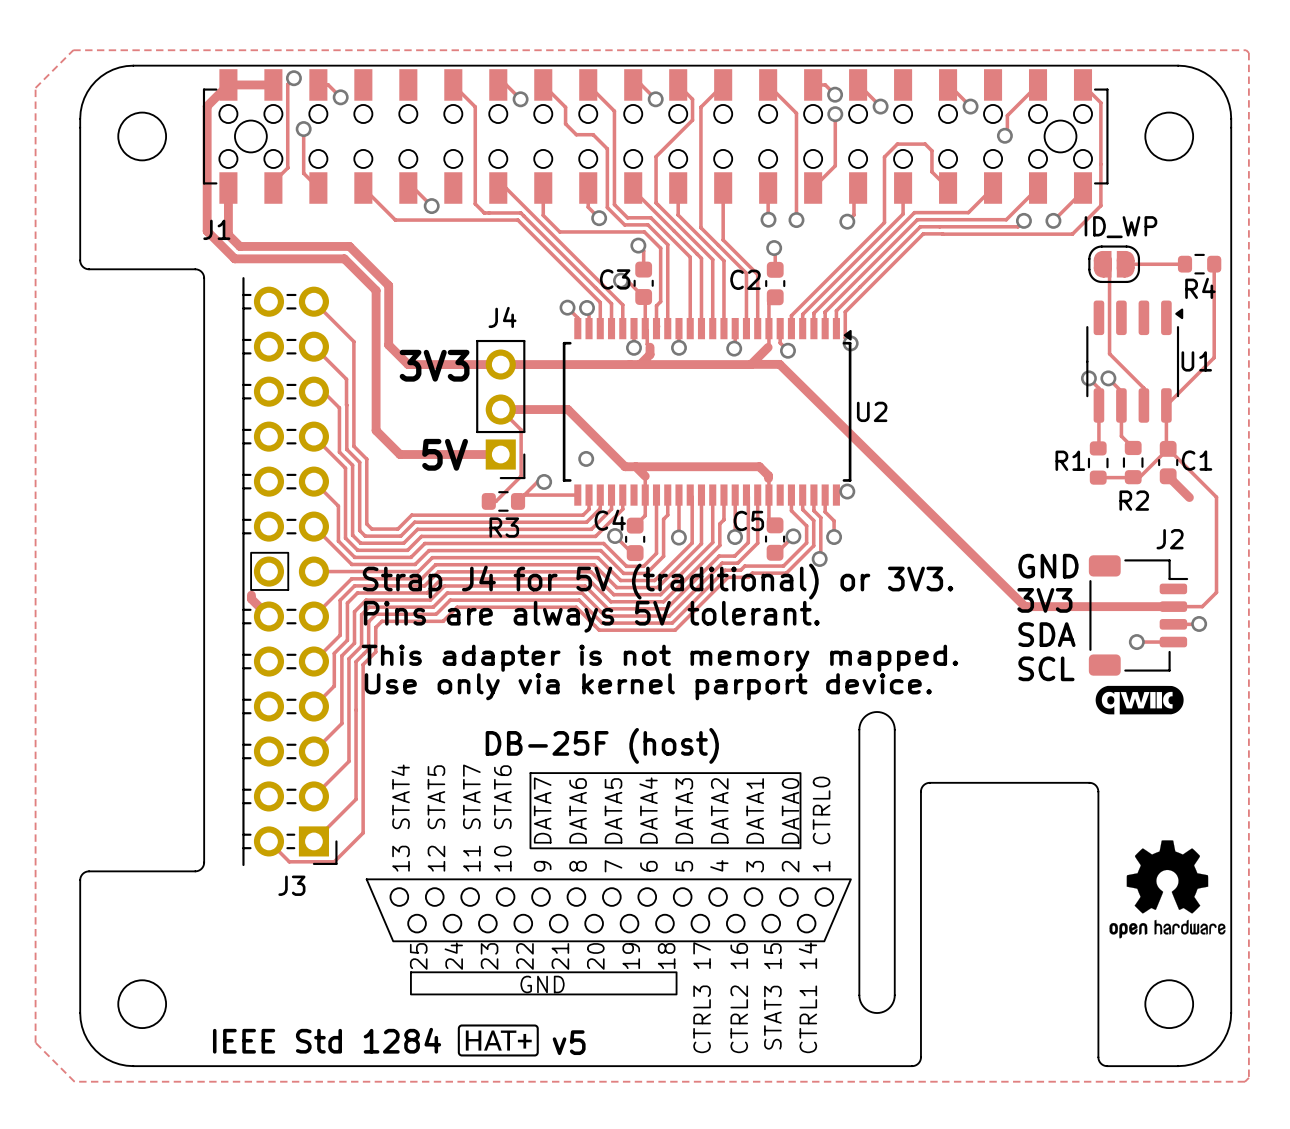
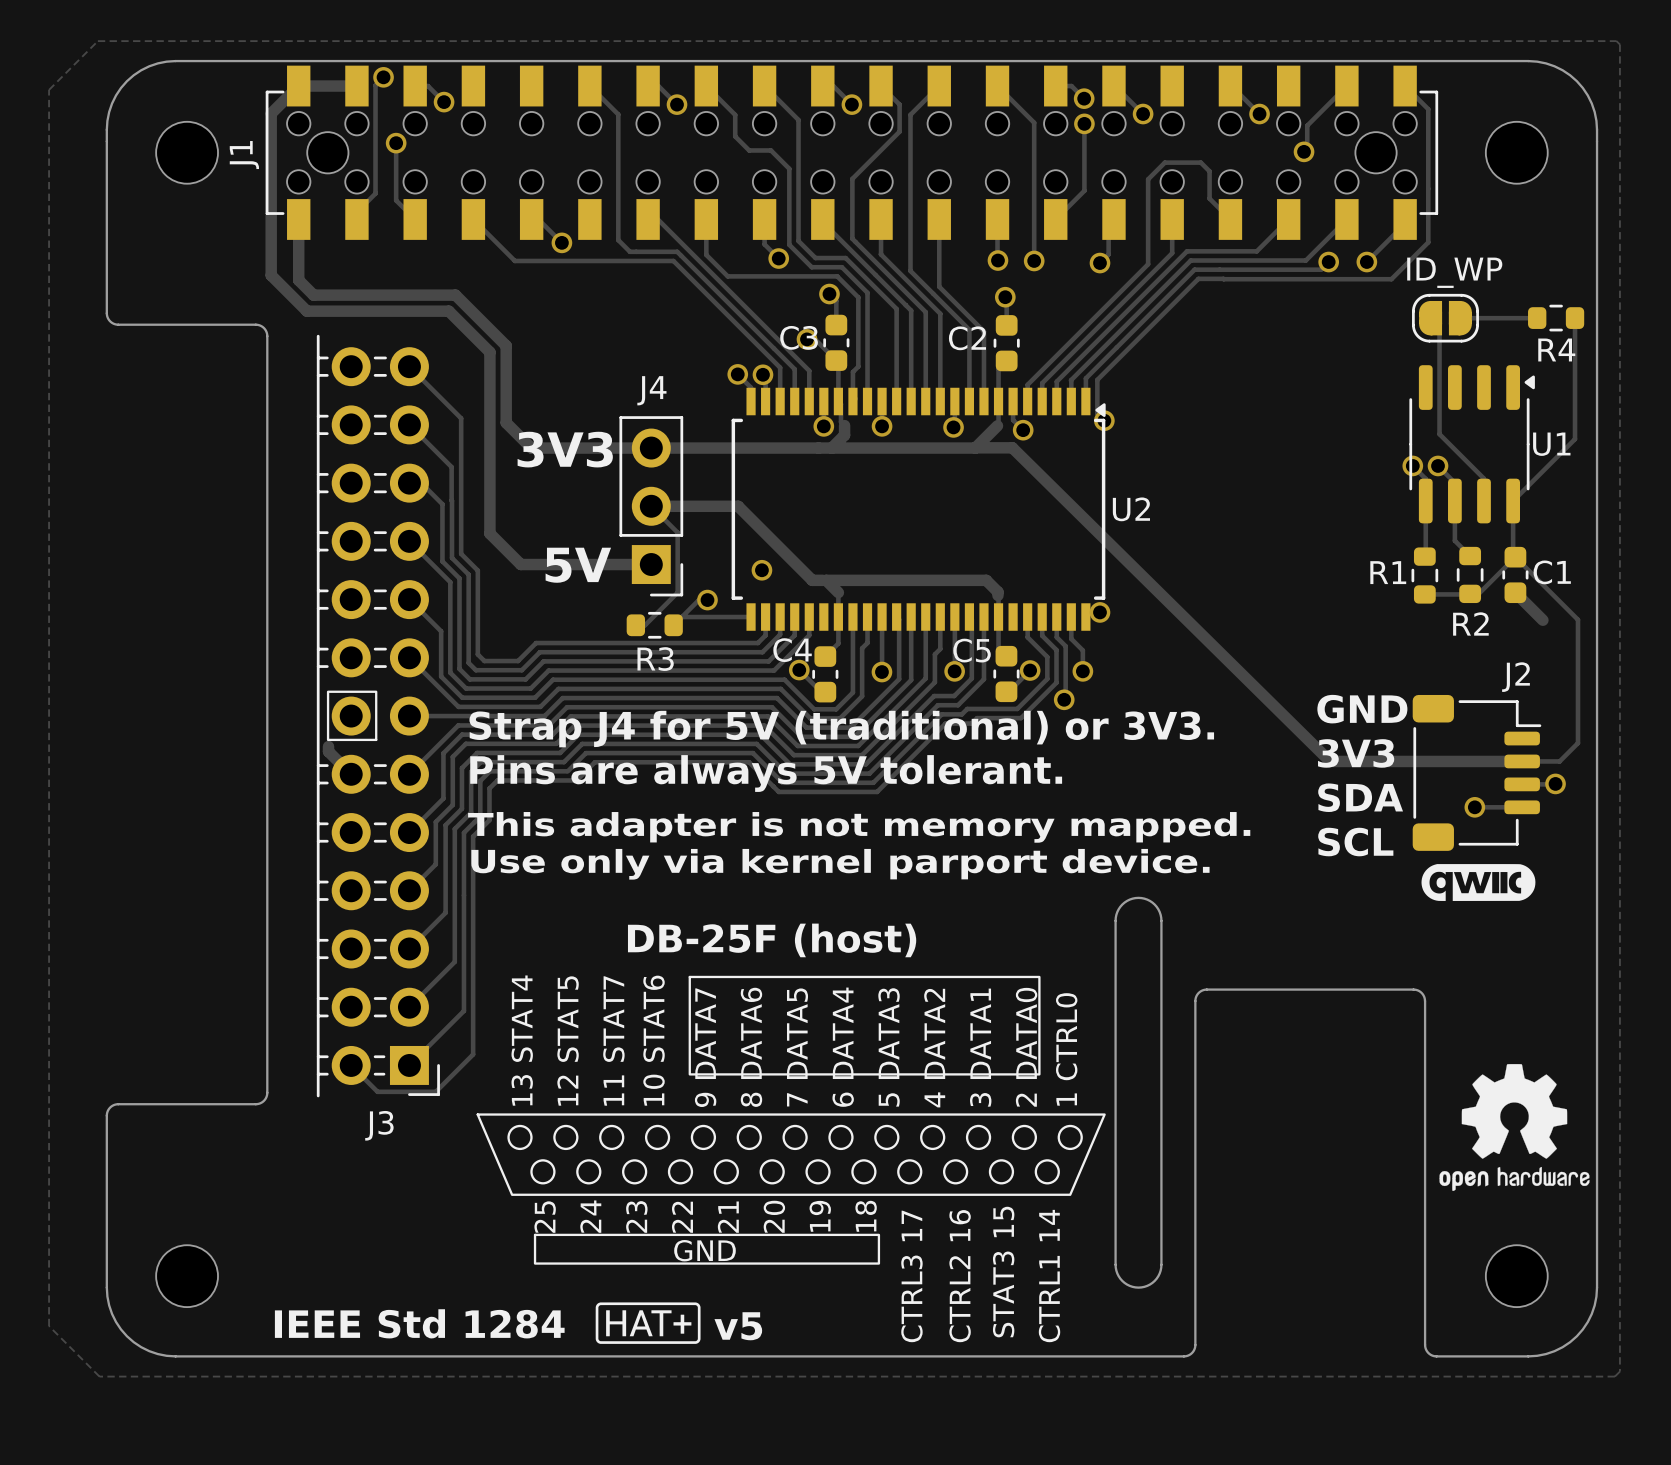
J1 name rotation: 0° (216, 229) -> 90° counterclockwise (244, 155)
J1 name position: J1 (216, 229) -> J1 (244, 155)

